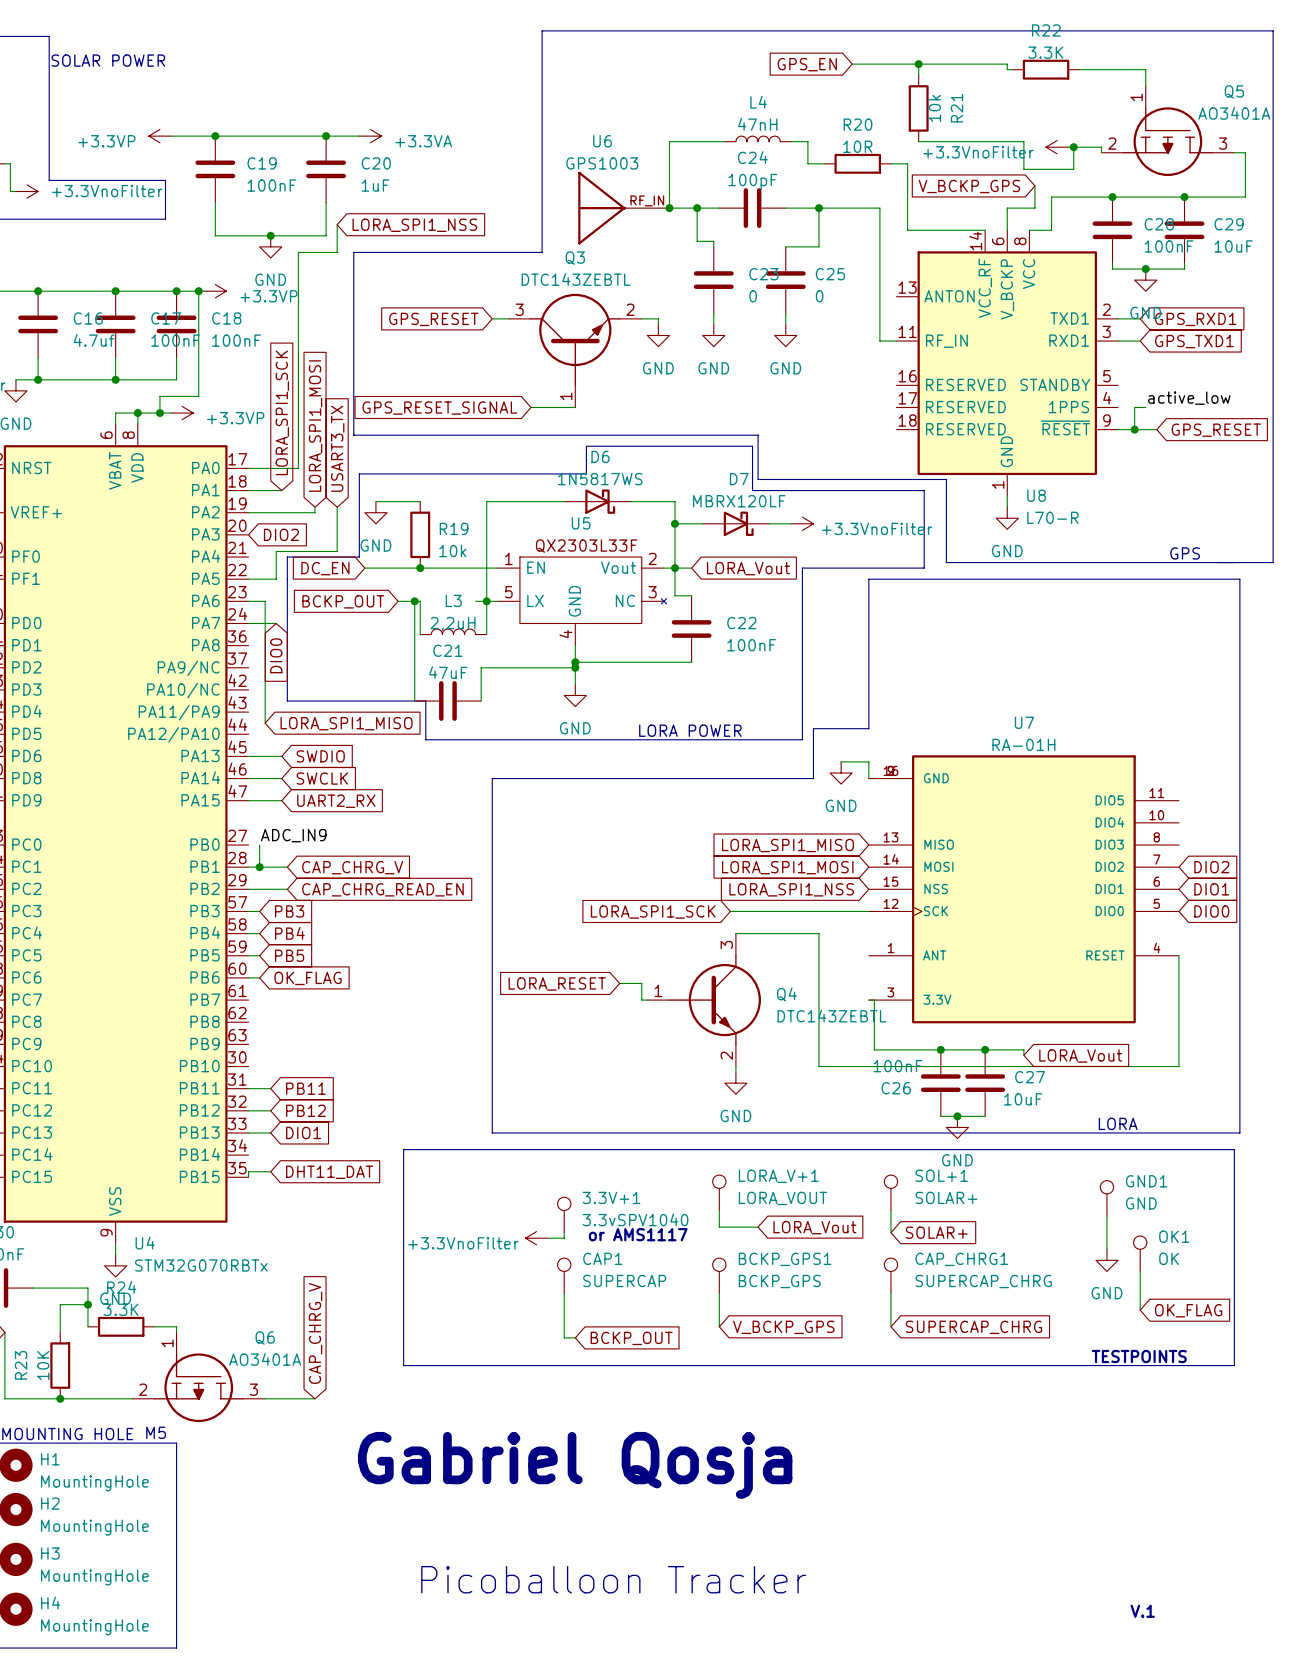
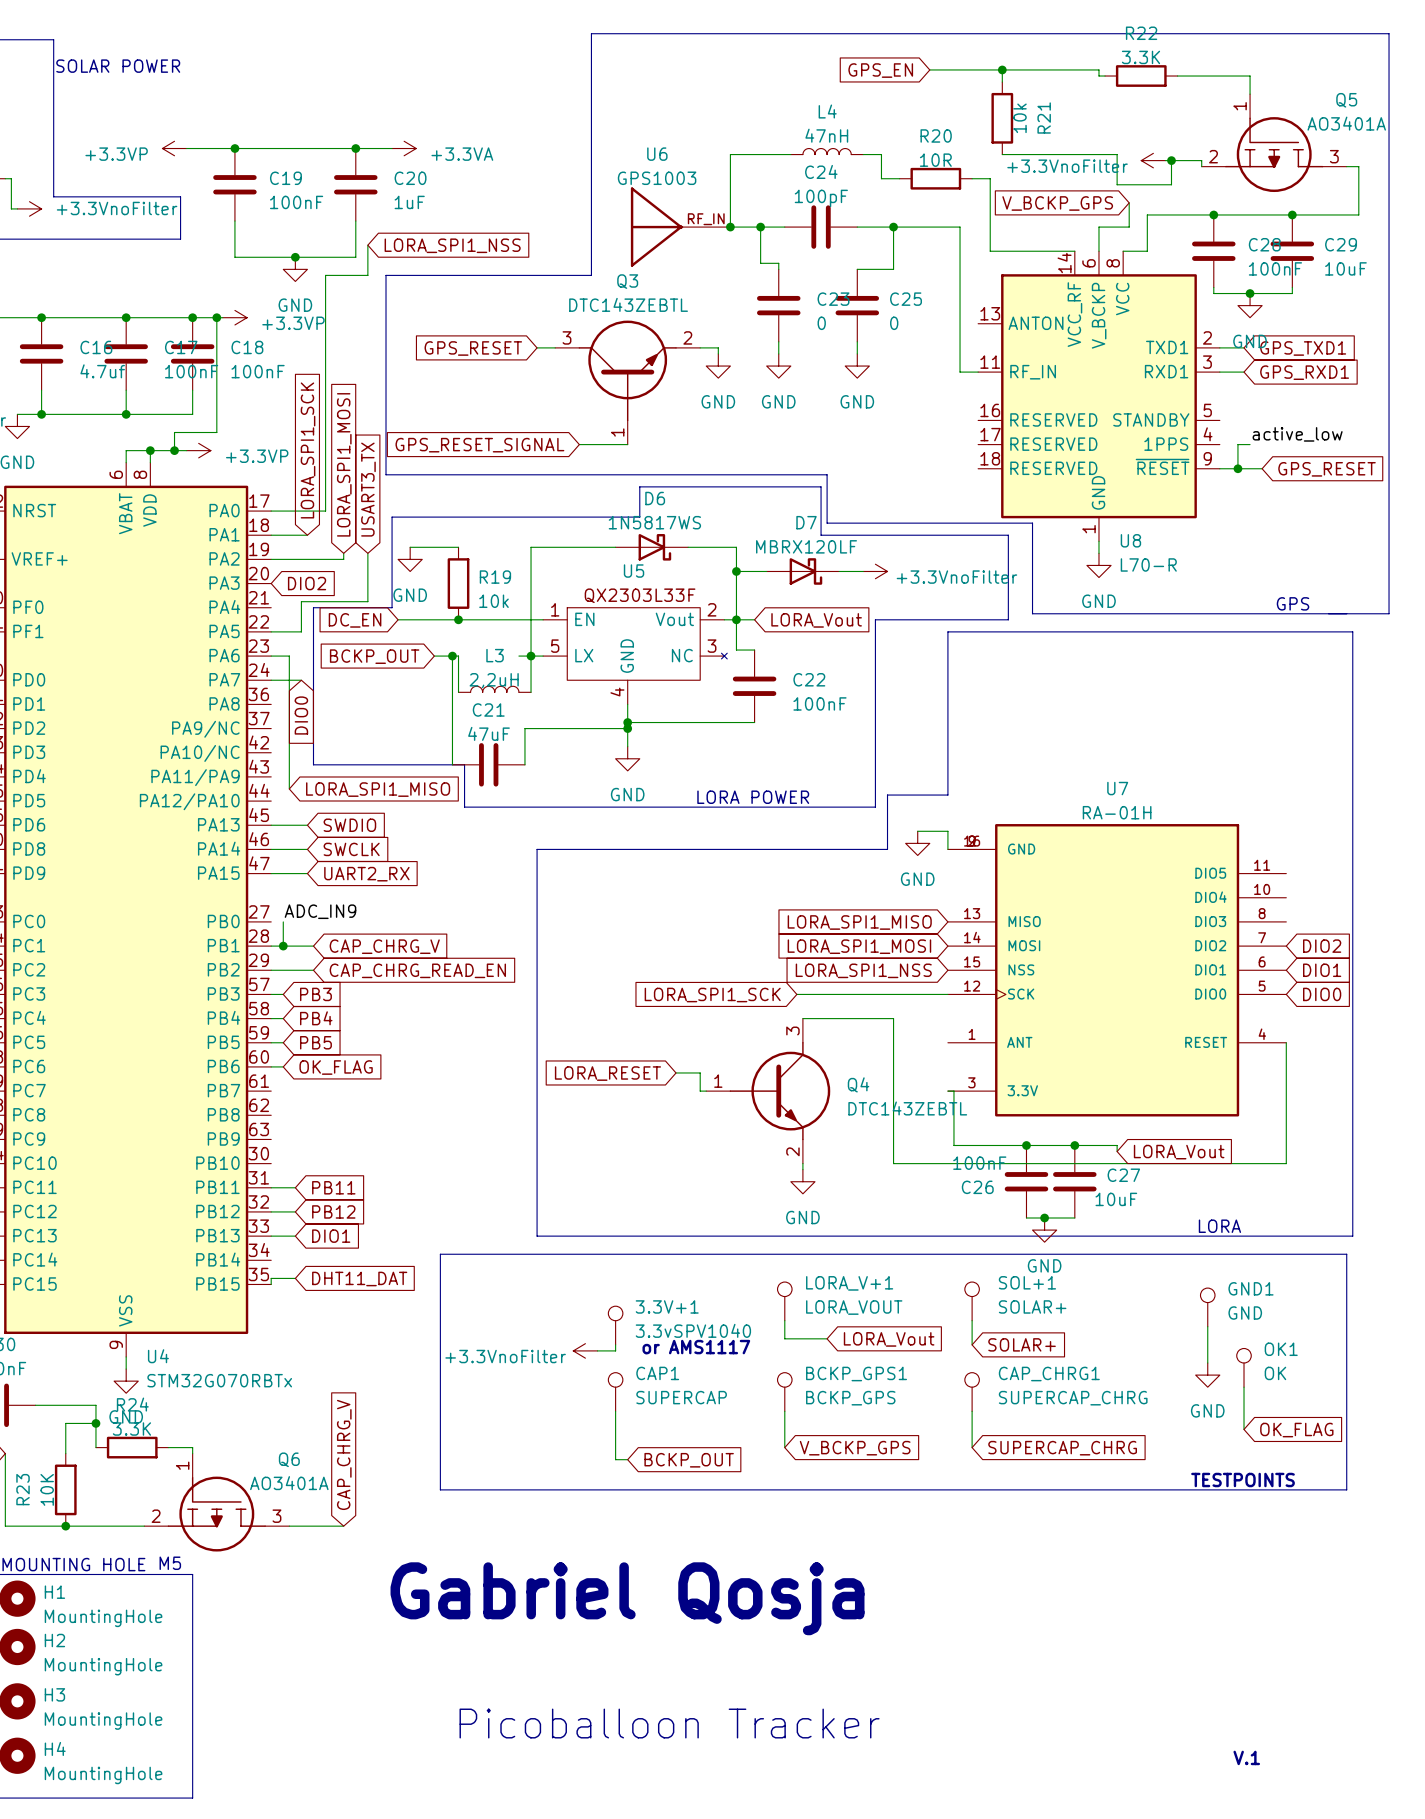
global label: GPS_RXD1 (1195, 319) -> GPS_TXD1 (1303, 348)
global label: GPS_TXD1 (1194, 341) -> GPS_RXD1 (1304, 372)

